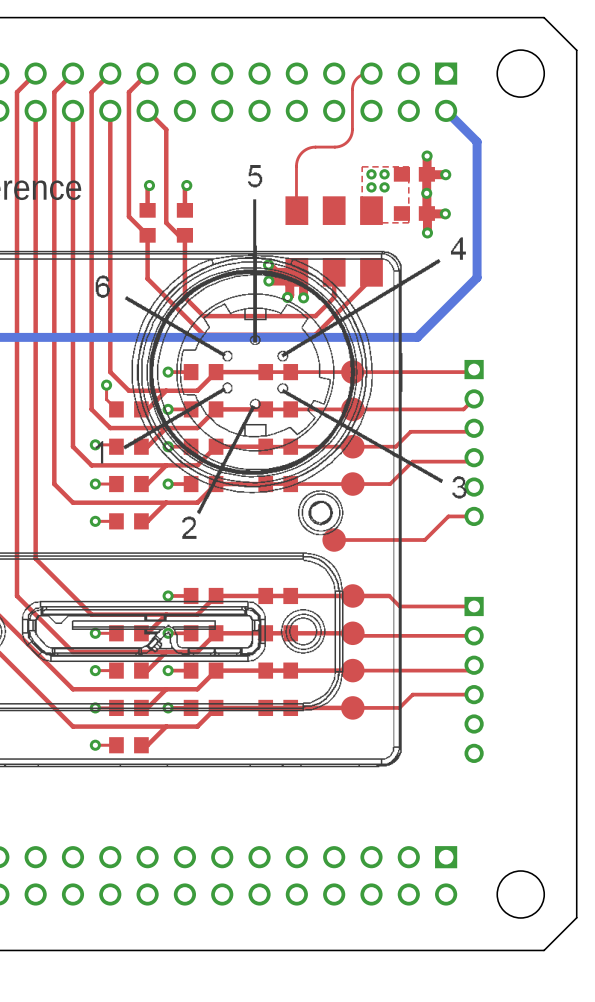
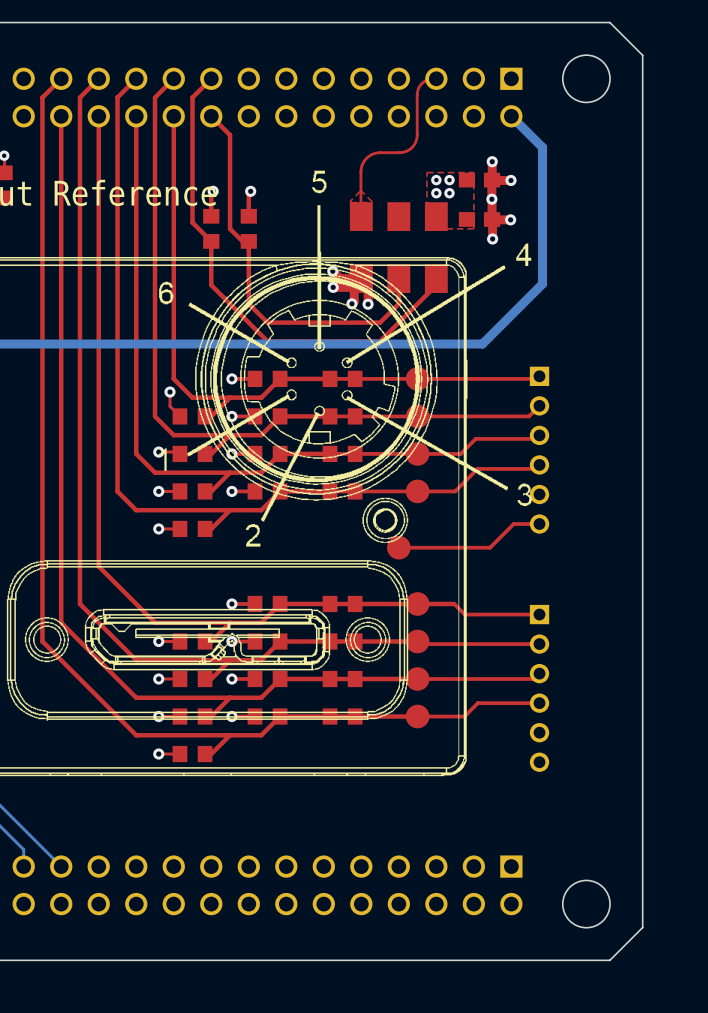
top zone outline: none -> (361, 191) (371, 202) (350, 202) (360, 191) (361, 191)

